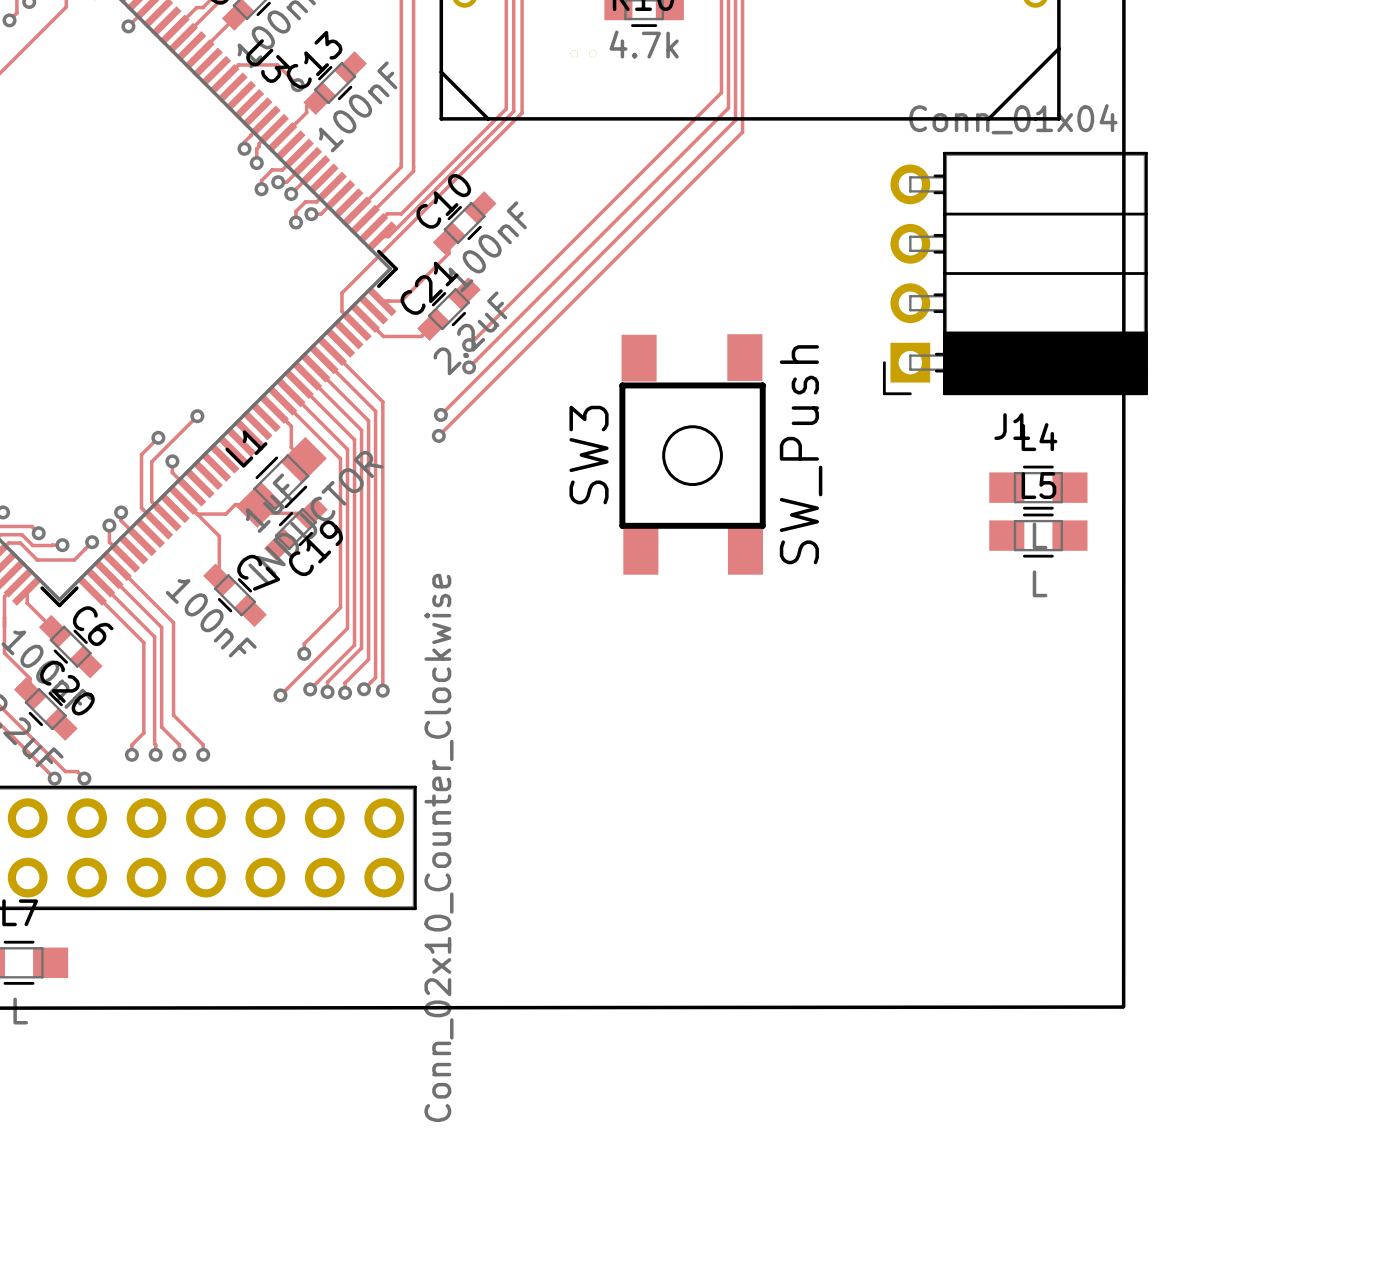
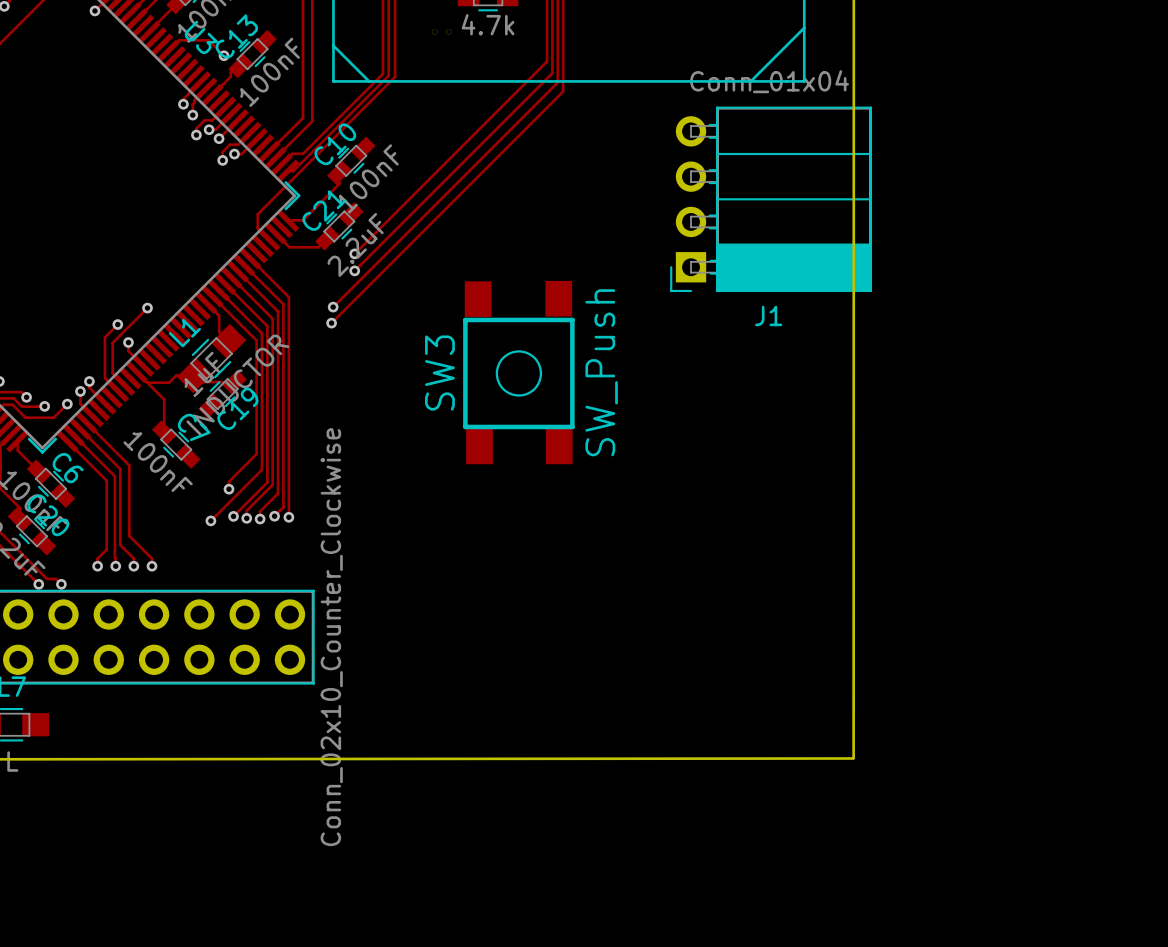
SW3 position: (692, 454) -> (518, 372)
L4: L (1038, 487) -> none
L5: L (1038, 535) -> none

